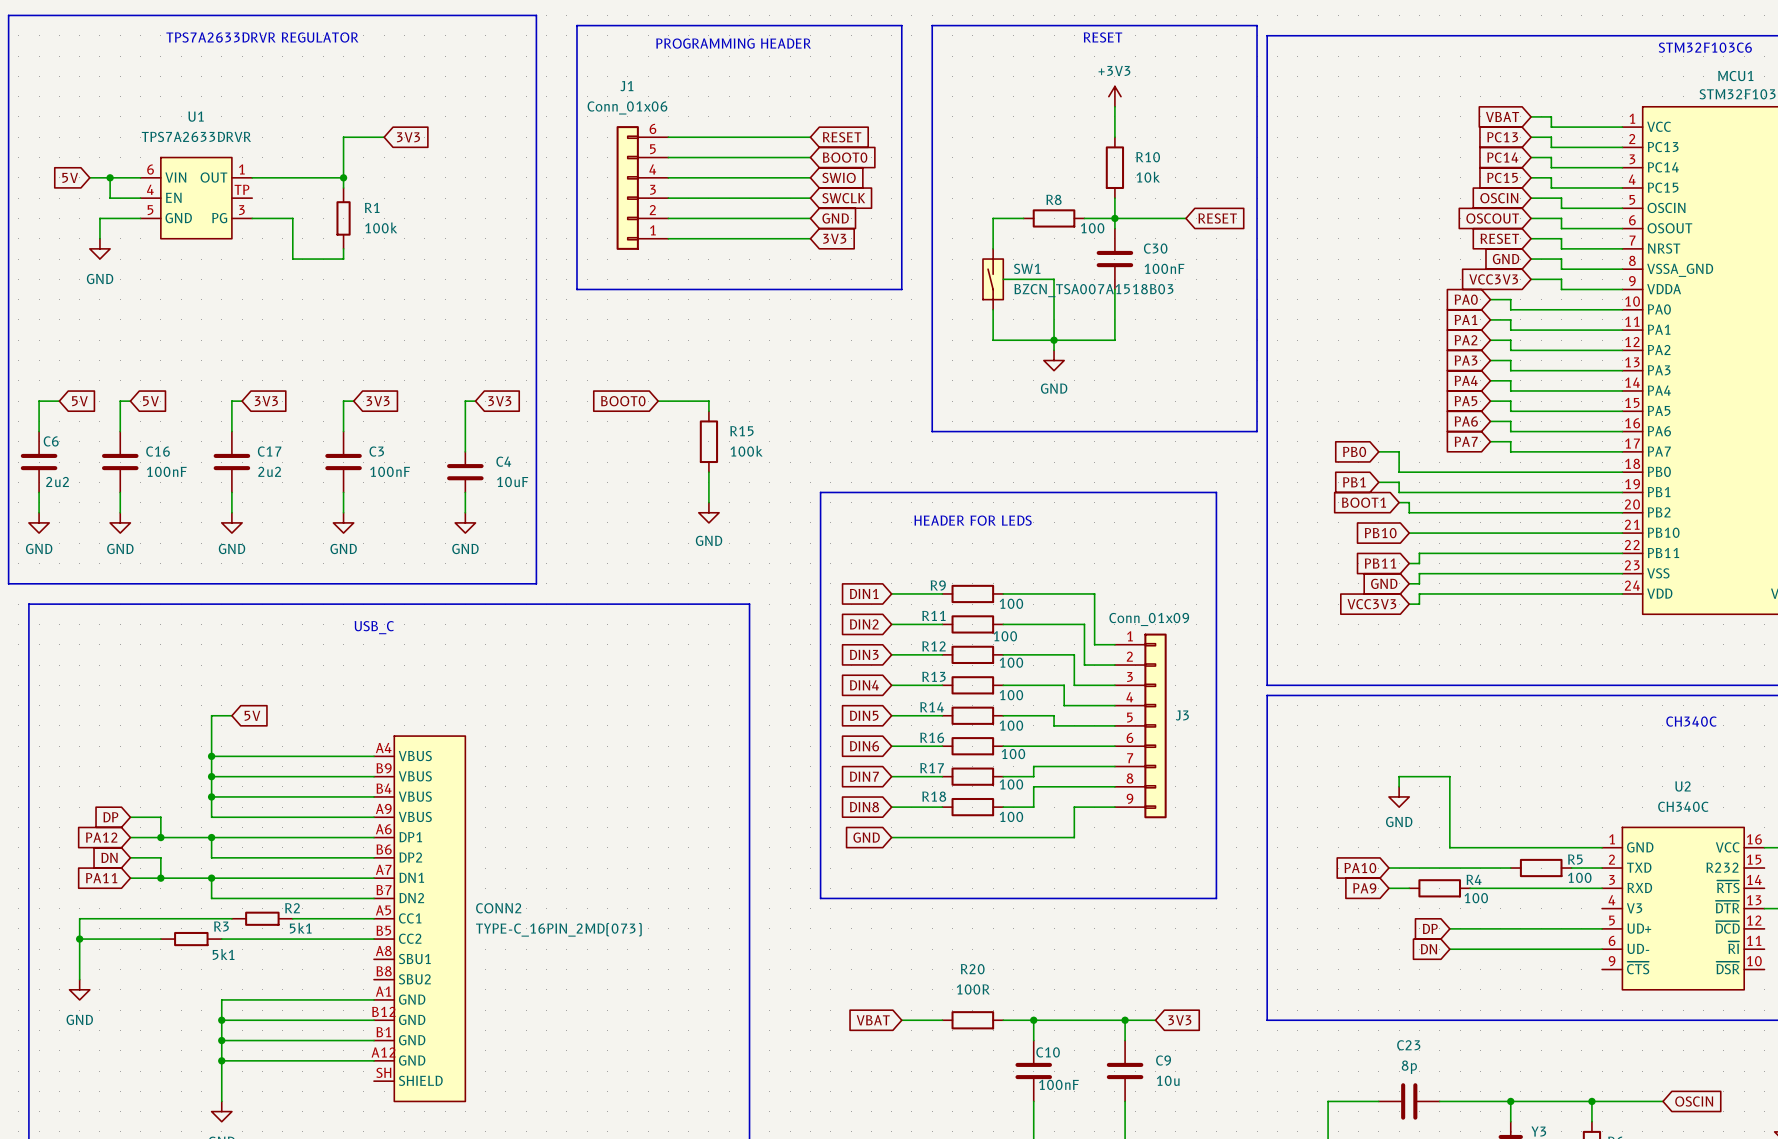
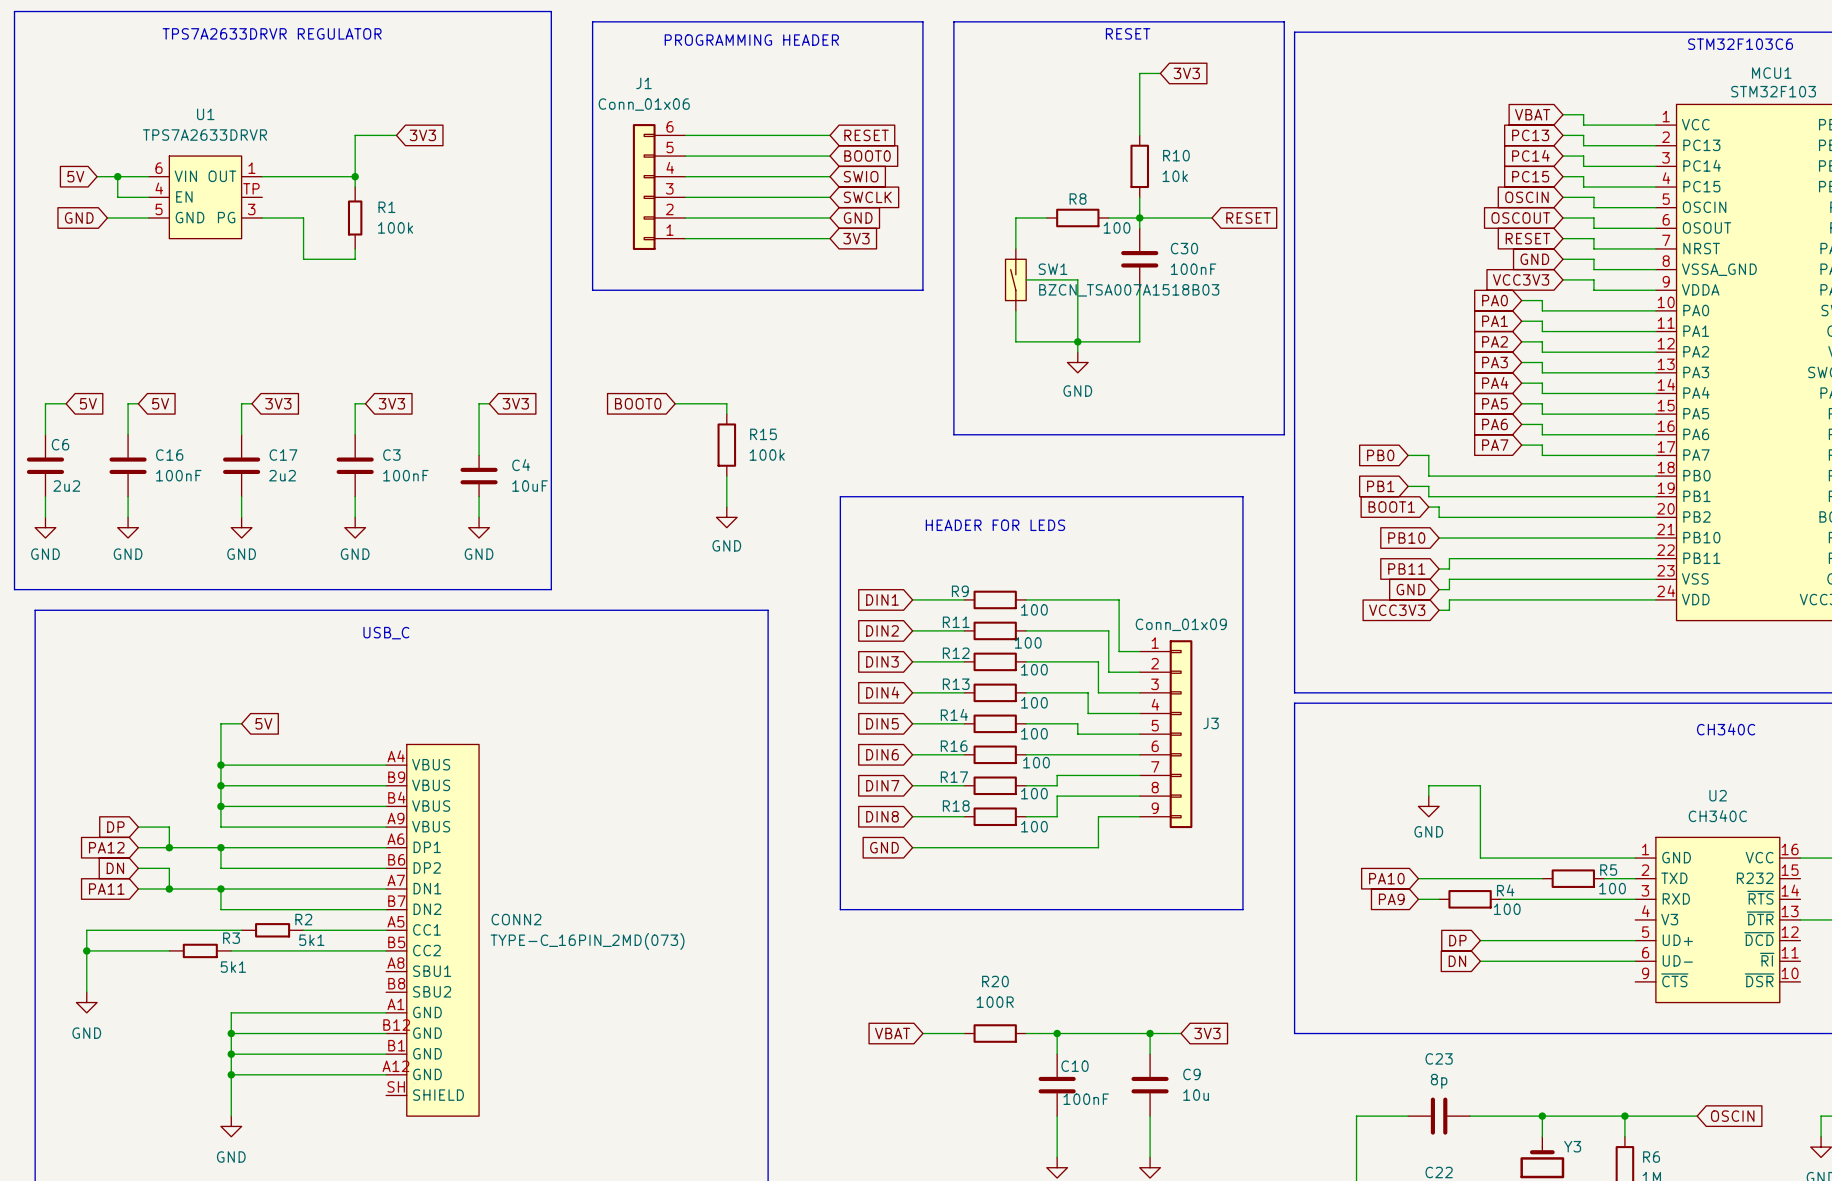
wire: none -> (1160, 73) (1139, 73) (1139, 104)
global label: none -> 3V3 (1186, 73)
power symbol: +3V3 (1114, 96) -> none
global label: none -> GND (79, 217)
wire: (99, 218) (99, 238) -> none
power symbol: GND (99, 248) -> none

